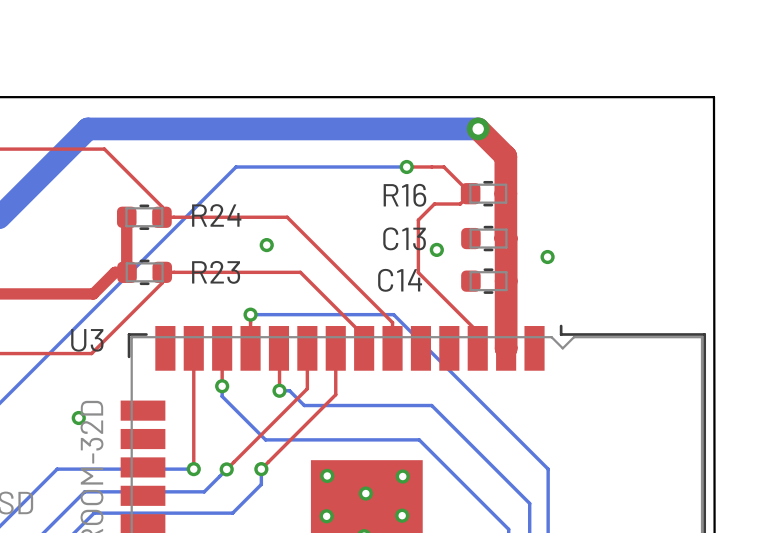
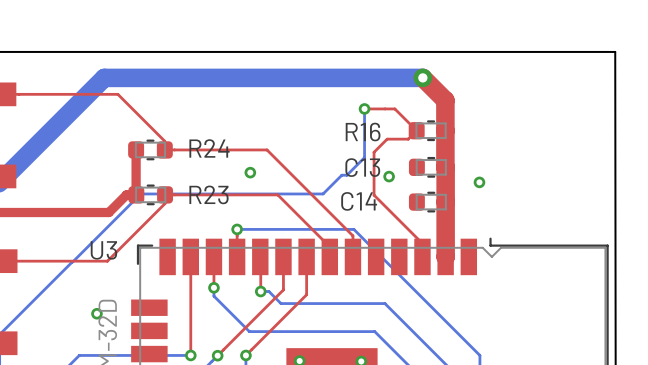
bottom track: (406, 166) (236, 166) (48, 354) -> (364, 108) (364, 157) (346, 175) (341, 175) (323, 193) (140, 193) (72, 261)

